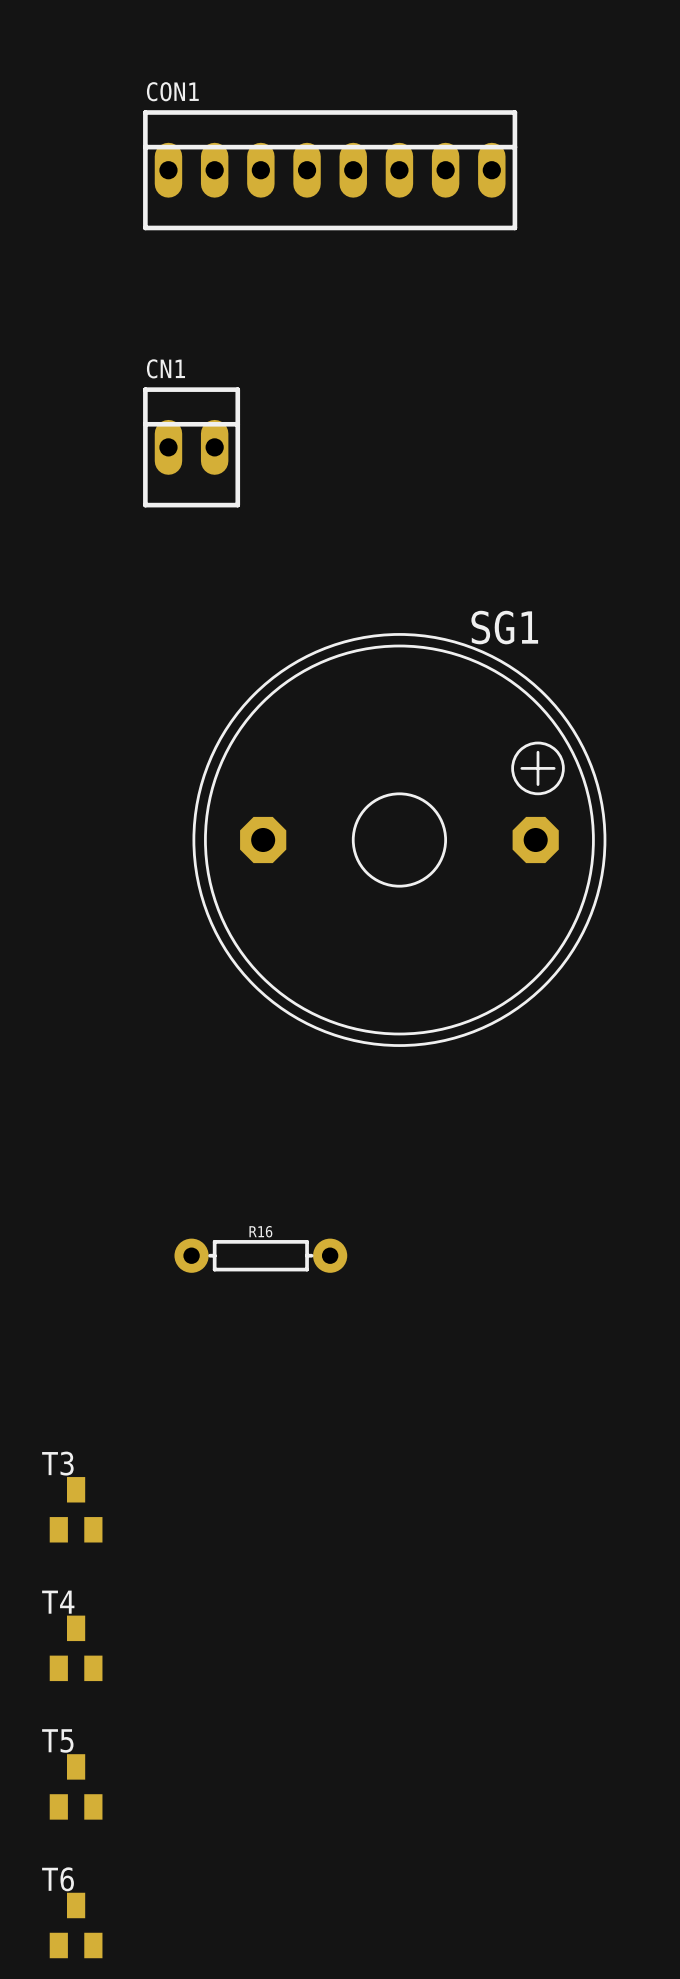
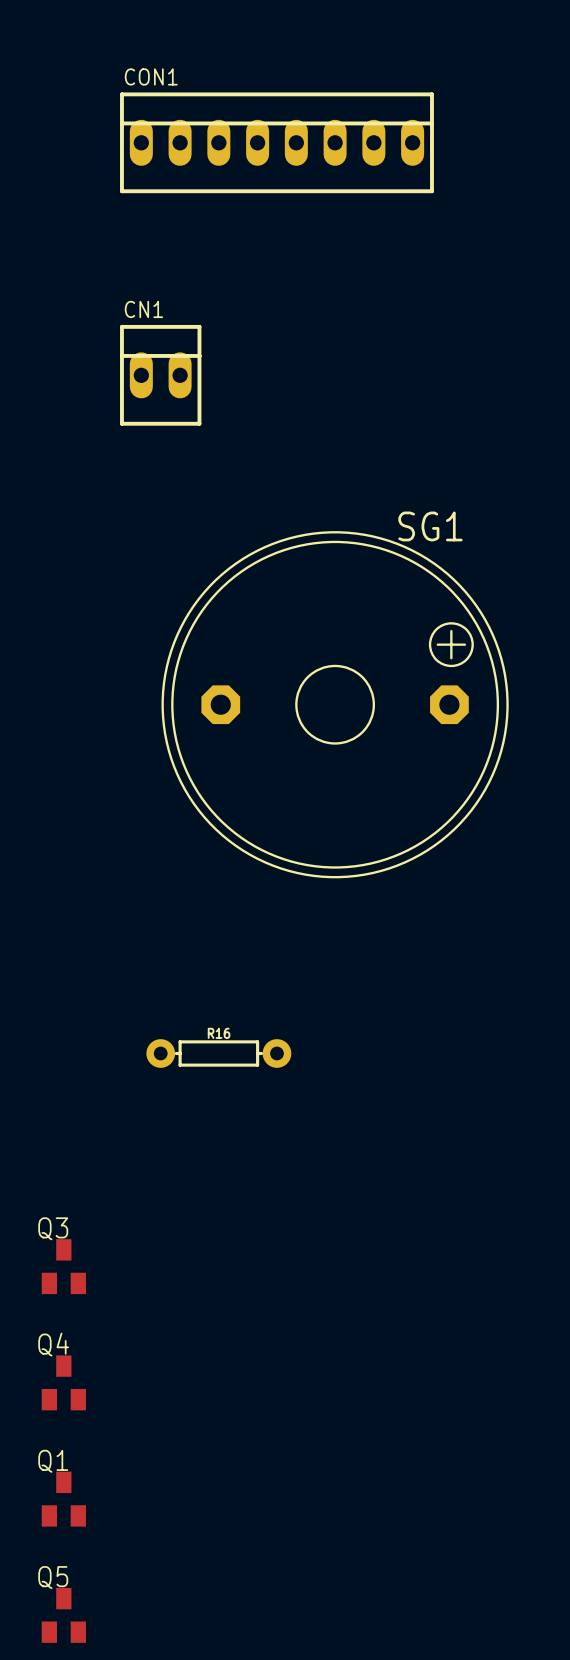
T3 name: T3 (57, 1463) -> Q3 (53, 1228)
T4 name: T4 (58, 1602) -> Q4 (53, 1344)
T5 name: T5 (57, 1740) -> Q1 (53, 1461)
T6 name: T6 (58, 1879) -> Q5 (53, 1577)

